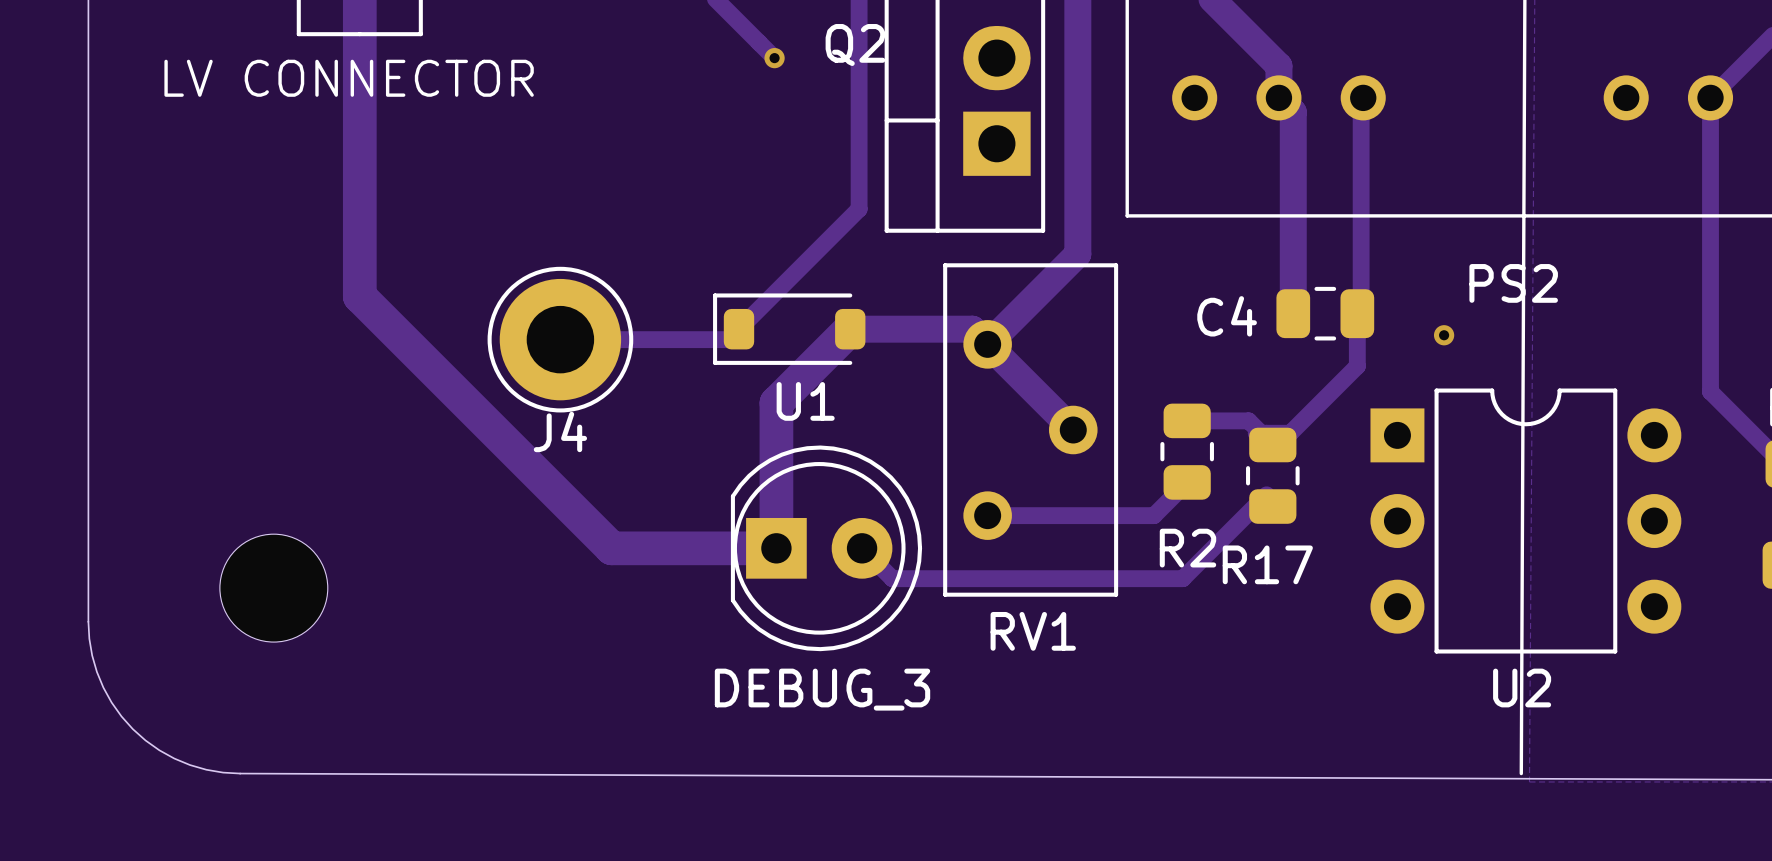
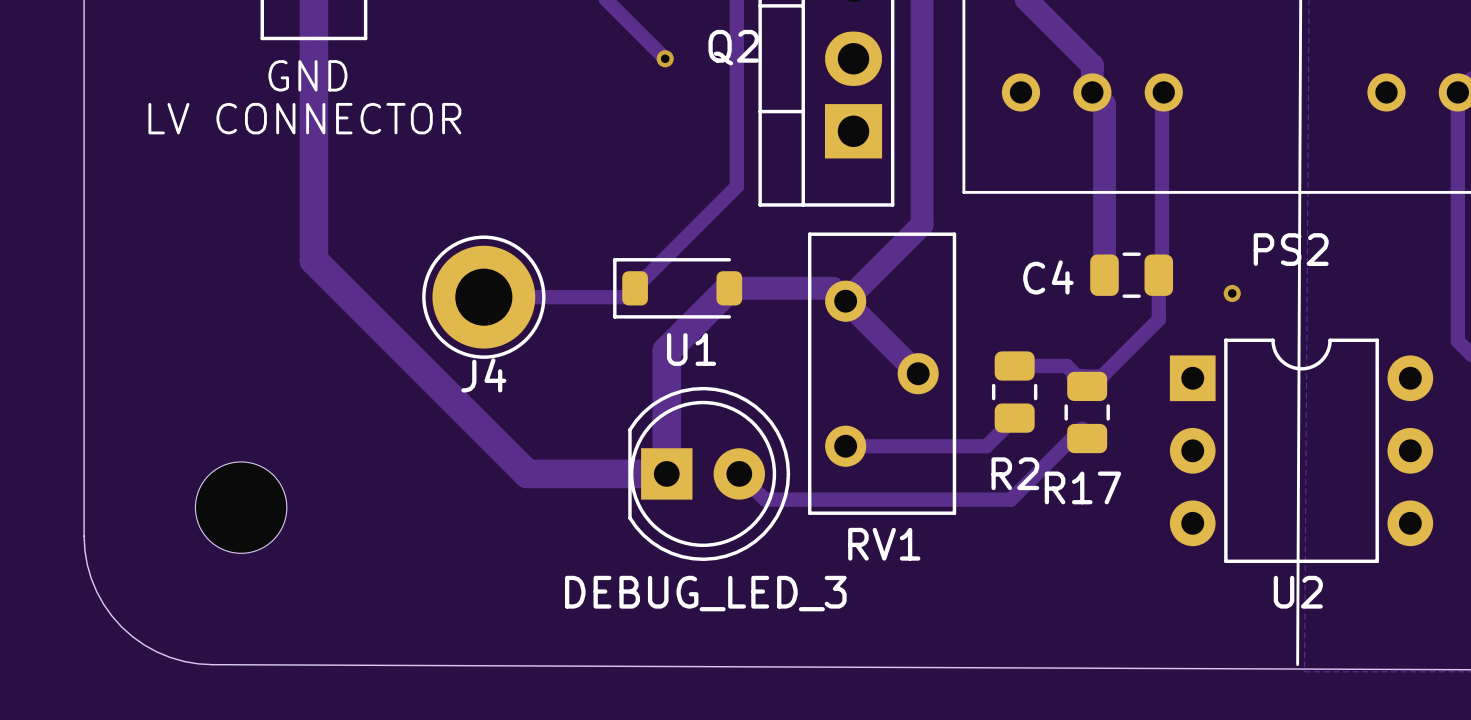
text position: LV CONNECTOR (349, 78) -> LV CONNECTOR (304, 118)
text: none -> GND (307, 75)
DEBUG_3 name: DEBUG_3 (822, 689) -> DEBUG_LED_3 (705, 593)

